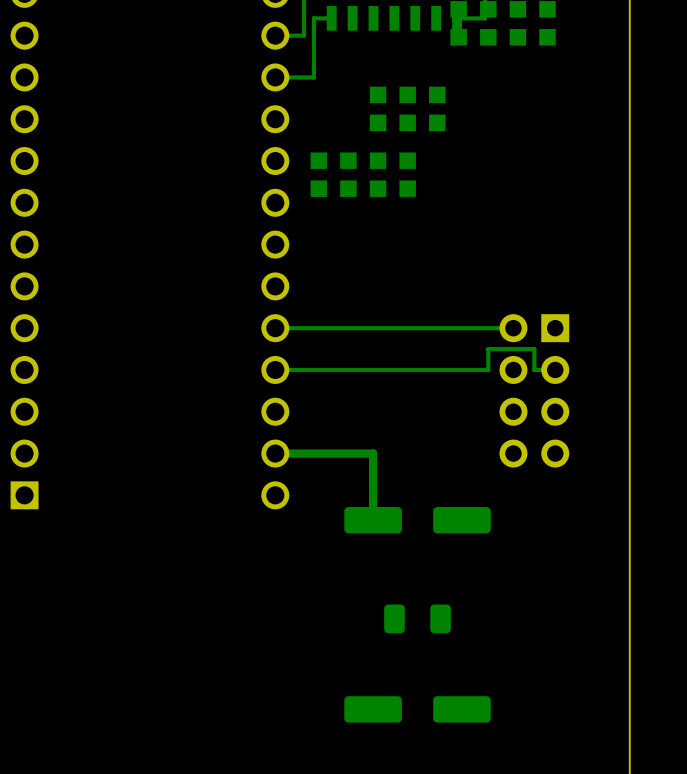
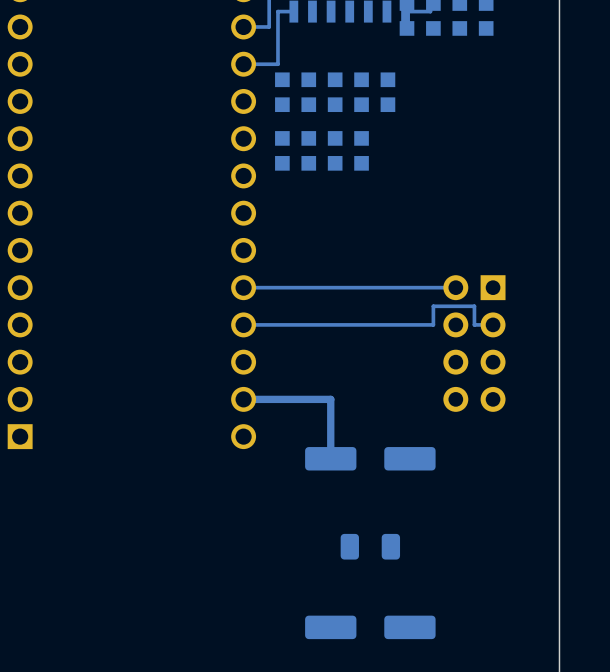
part: none -> (282, 92)
part: none -> (308, 92)

